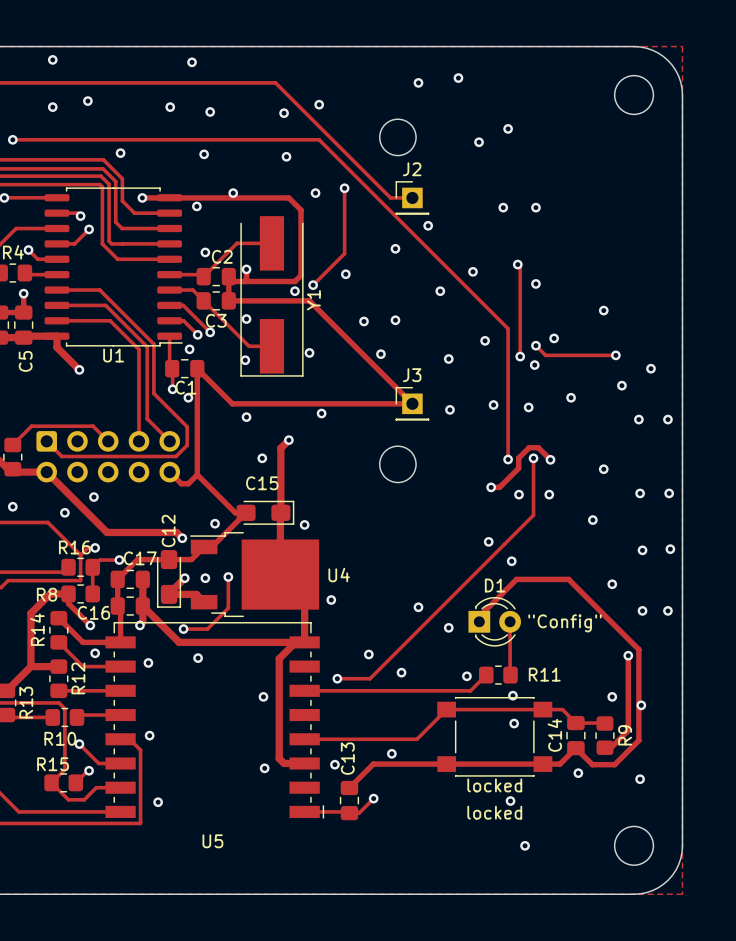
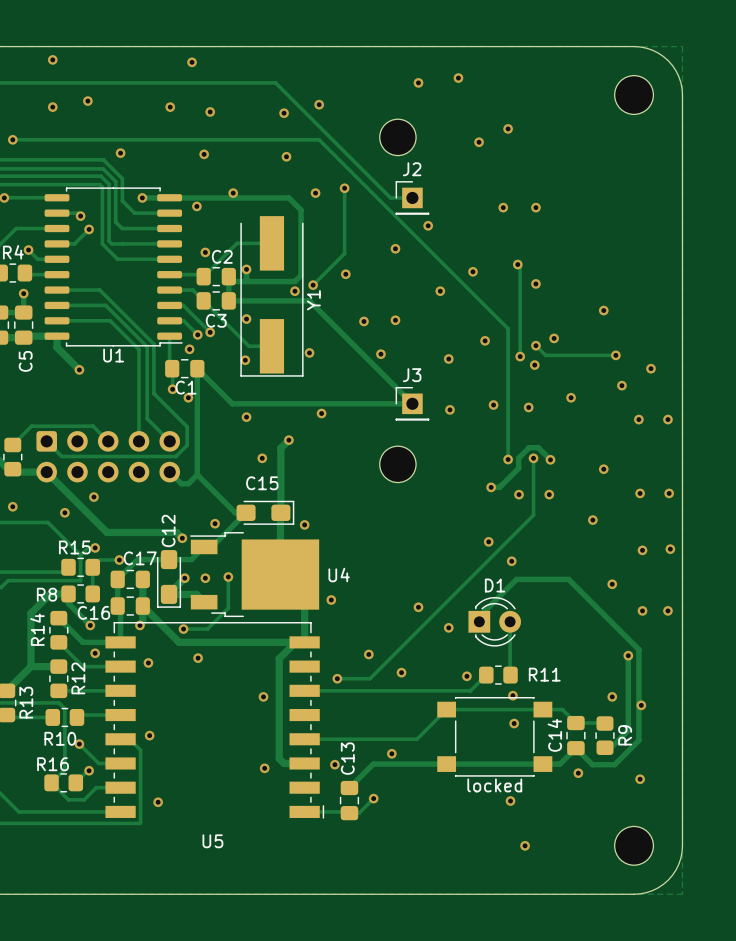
R16 name: R16 (74, 547) -> R15 (74, 547)
D1 value: "Config" (565, 623) -> none
R15 name: R15 (53, 764) -> R16 (53, 764)
locked value: locked (494, 812) -> none

